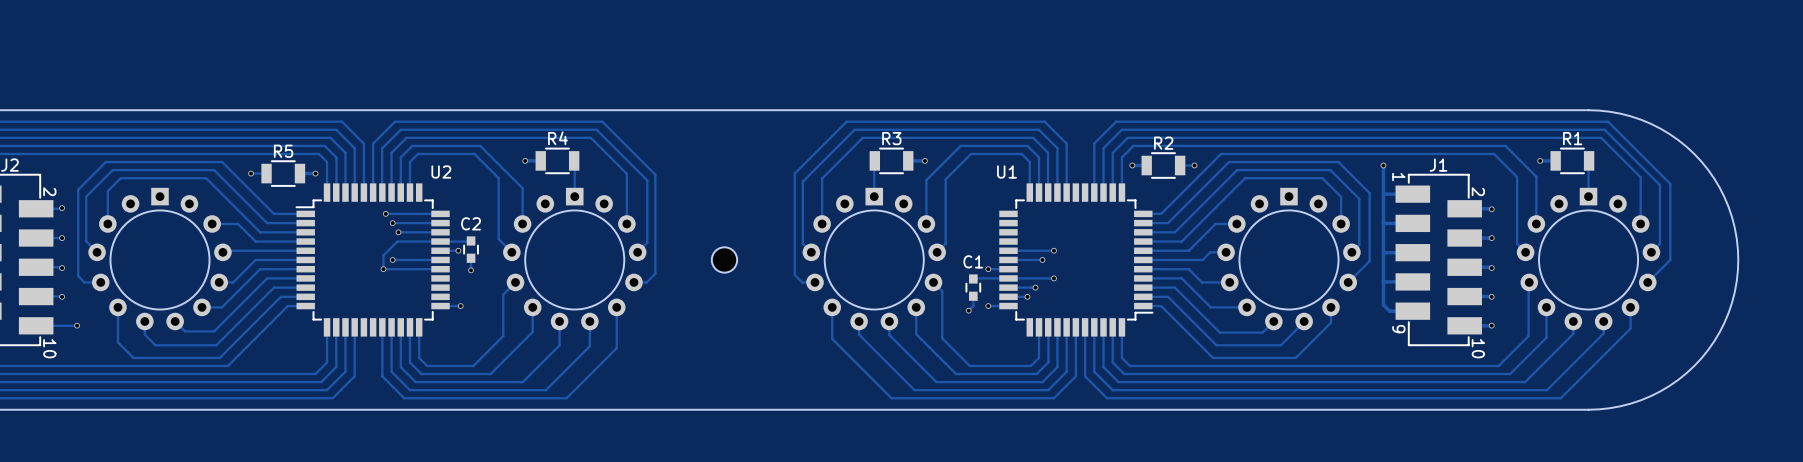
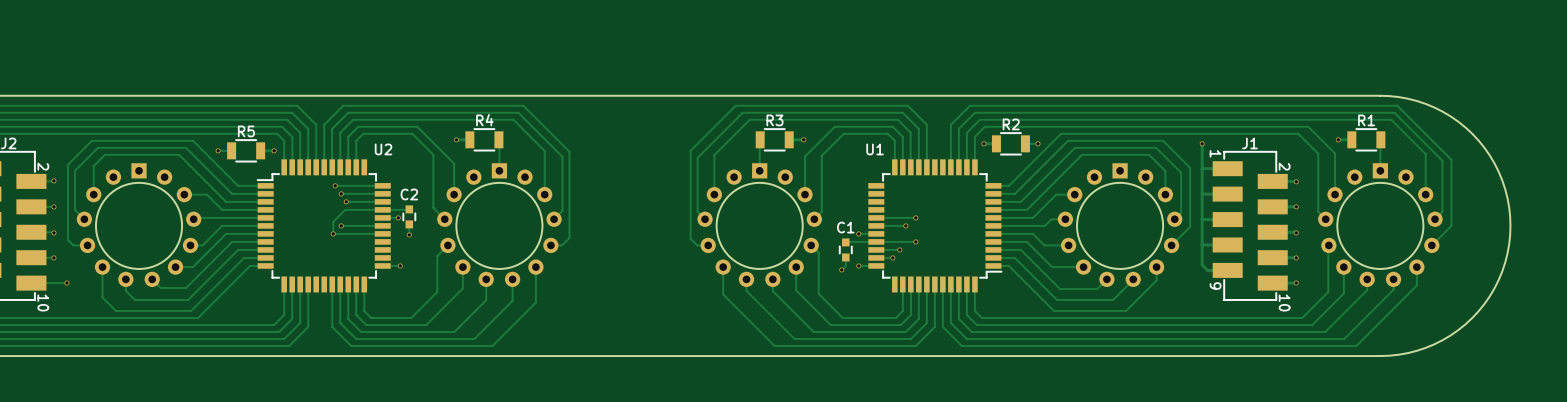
part: (724, 259) -> none

